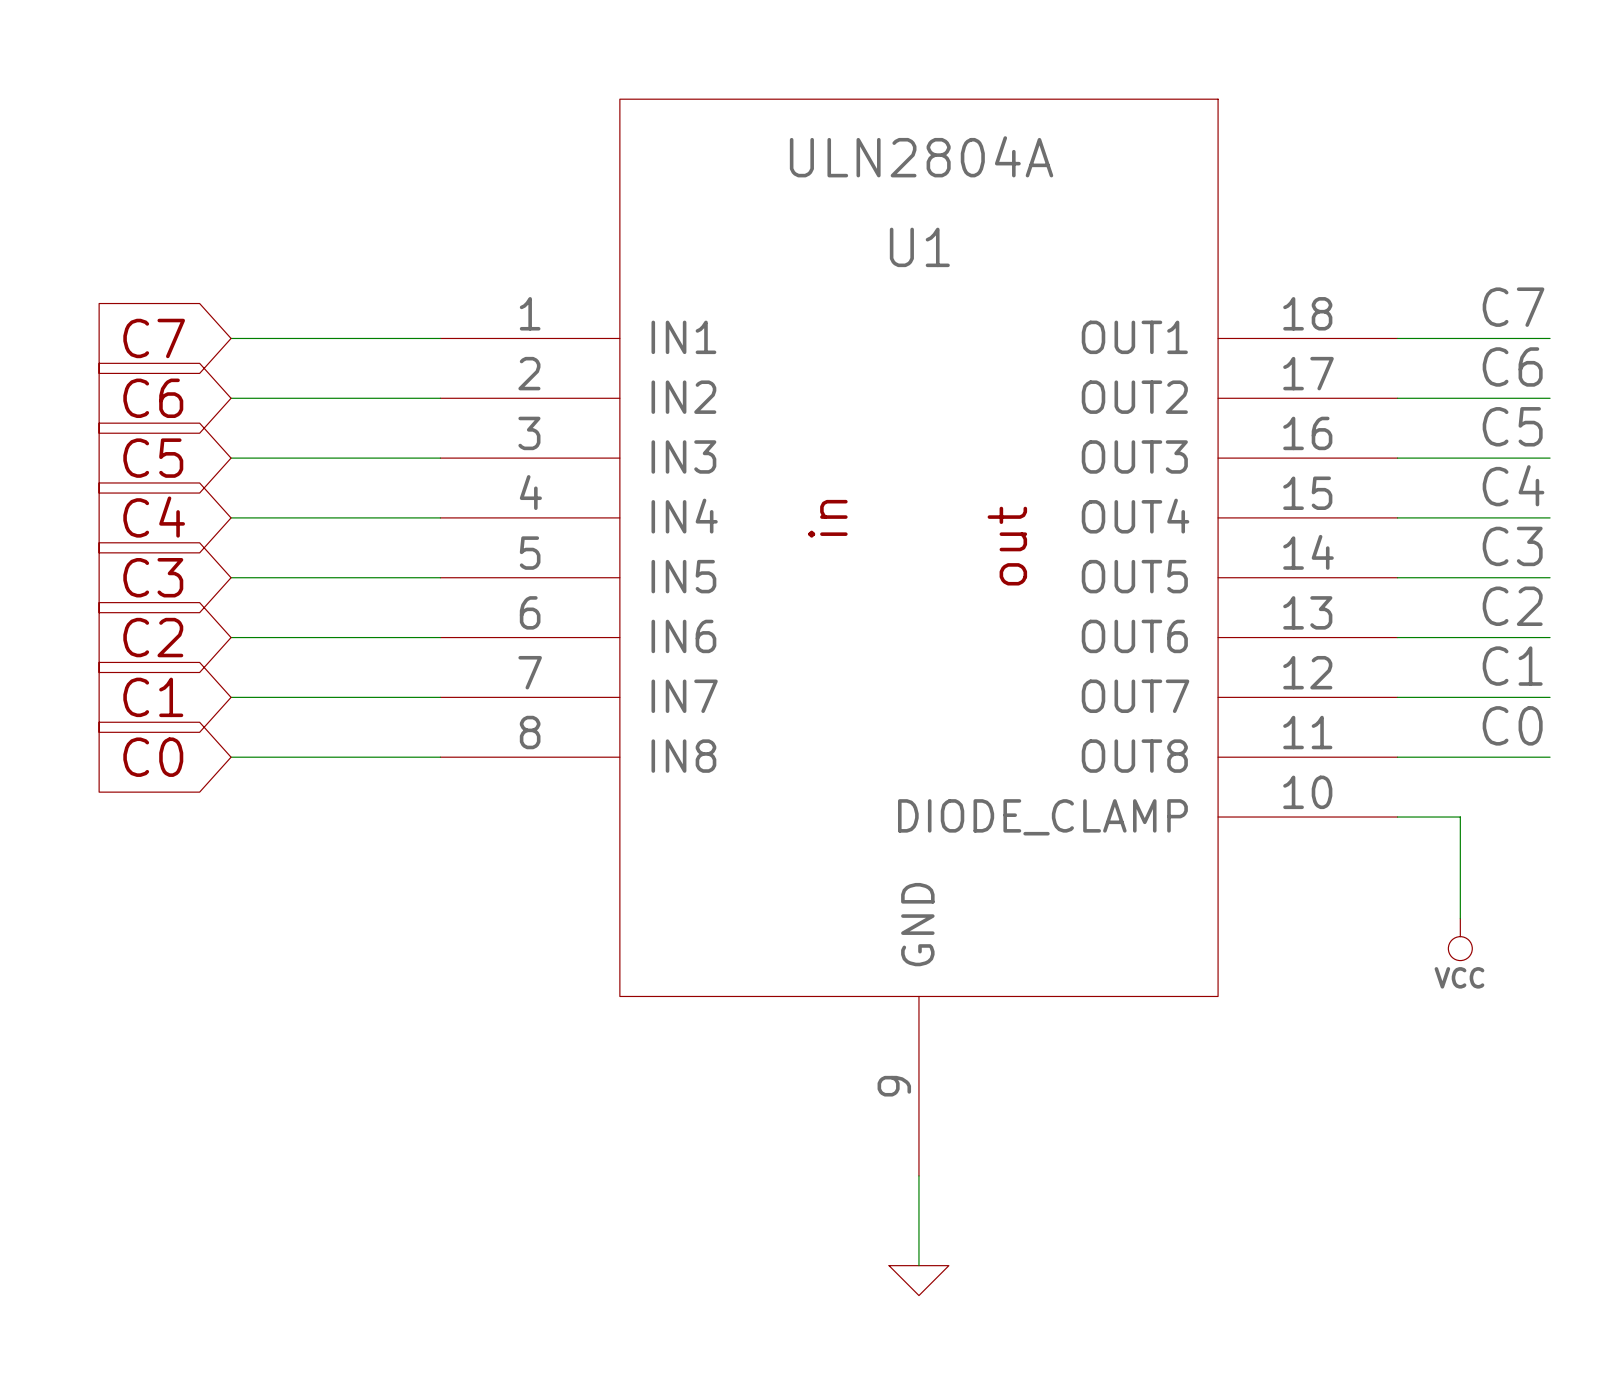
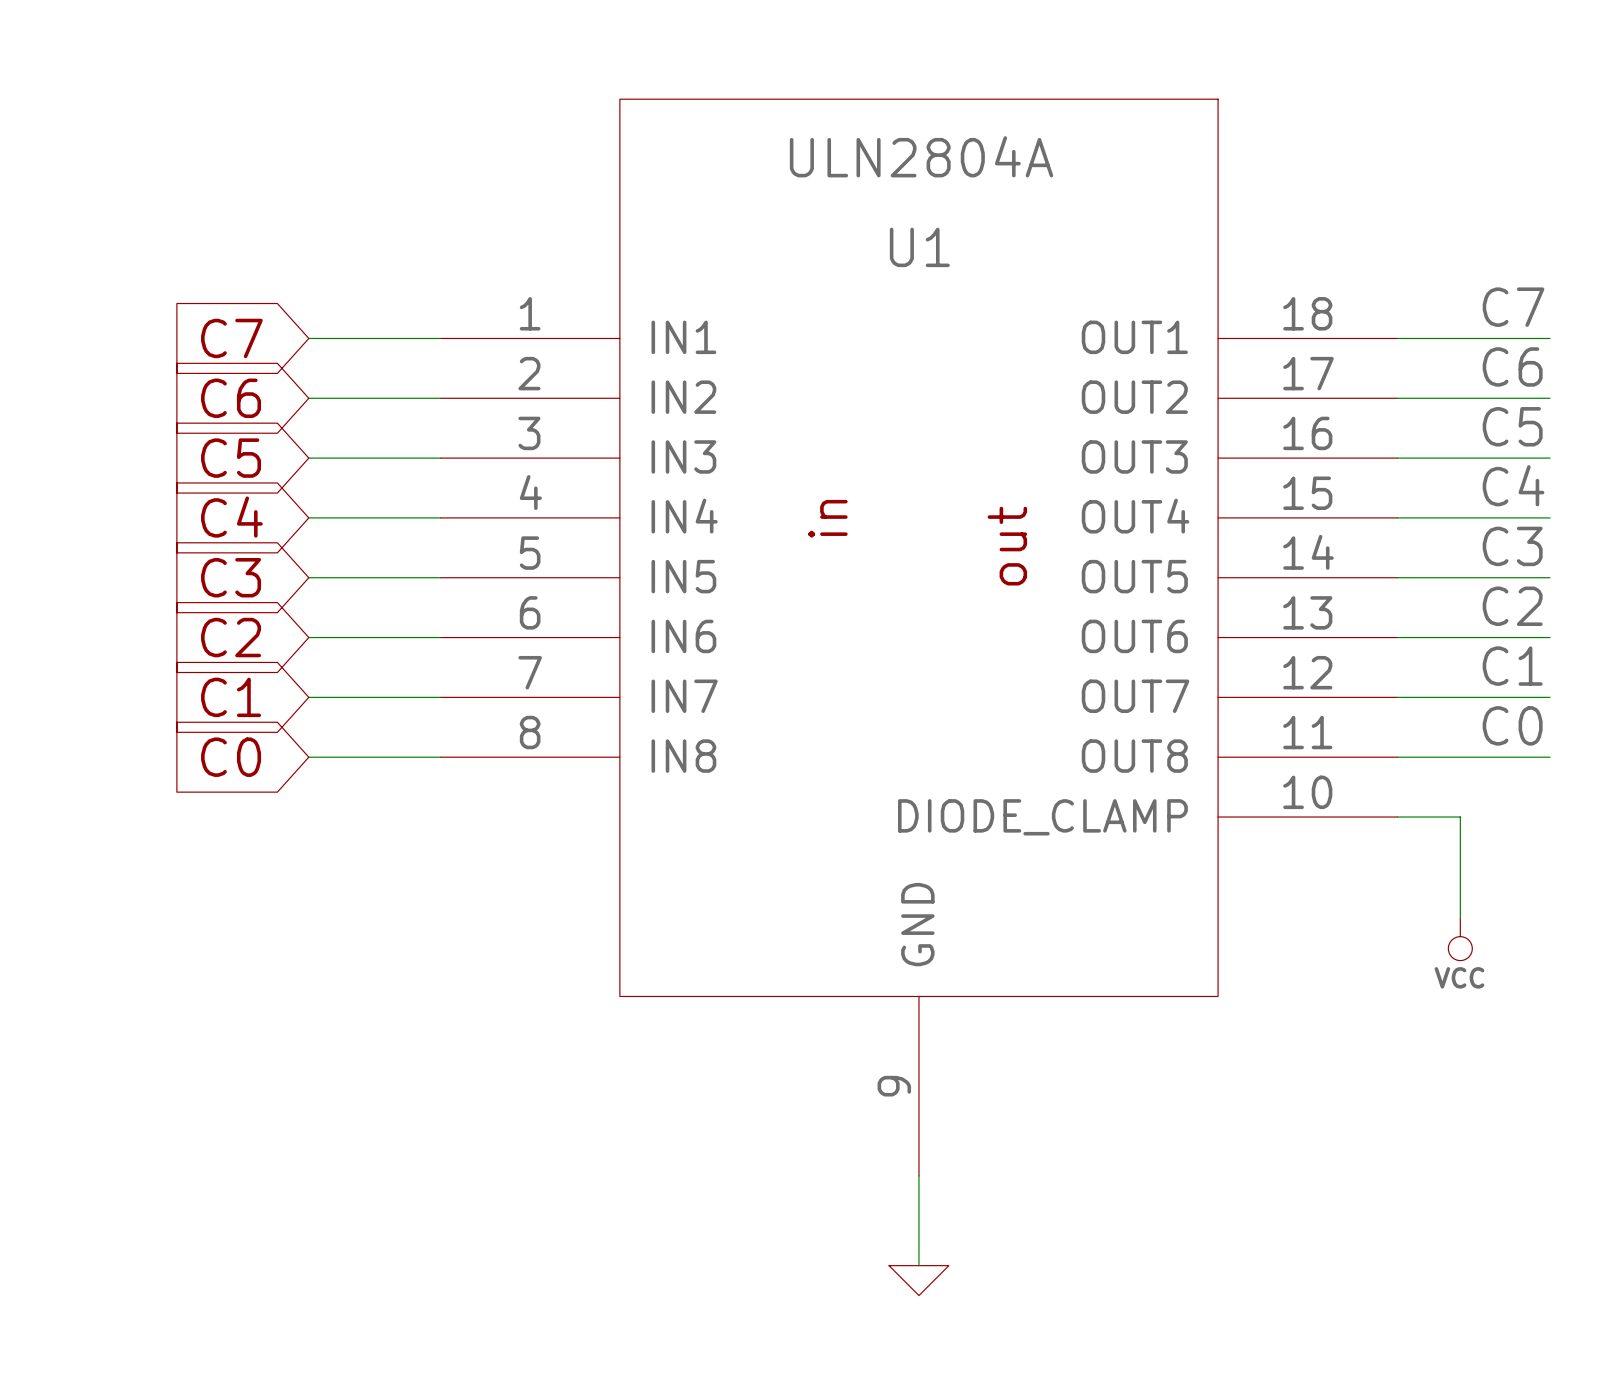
global label position: C7 (154, 338) -> C7 (231, 338)
wire: (231, 338) (308, 338) -> none
global label position: C6 (153, 398) -> C6 (231, 398)
wire: (231, 398) (308, 398) -> none
global label position: C5 (153, 458) -> C5 (231, 458)
wire: (231, 458) (308, 458) -> none
global label position: C4 (154, 517) -> C4 (231, 517)
wire: (231, 517) (308, 517) -> none
global label position: C3 (153, 577) -> C3 (231, 577)
wire: (231, 577) (308, 577) -> none
global label position: C2 (153, 637) -> C2 (231, 637)
wire: (231, 637) (308, 637) -> none
global label position: C1 (153, 697) -> C1 (231, 697)
wire: (231, 697) (308, 697) -> none
global label position: C0 (153, 757) -> C0 (231, 757)
wire: (231, 757) (308, 757) -> none

